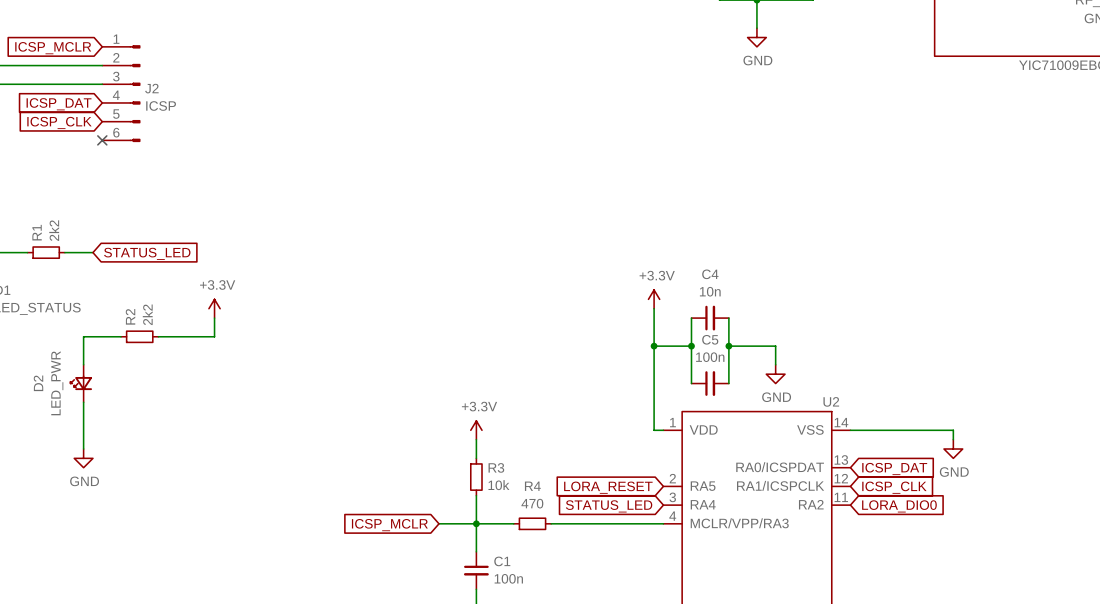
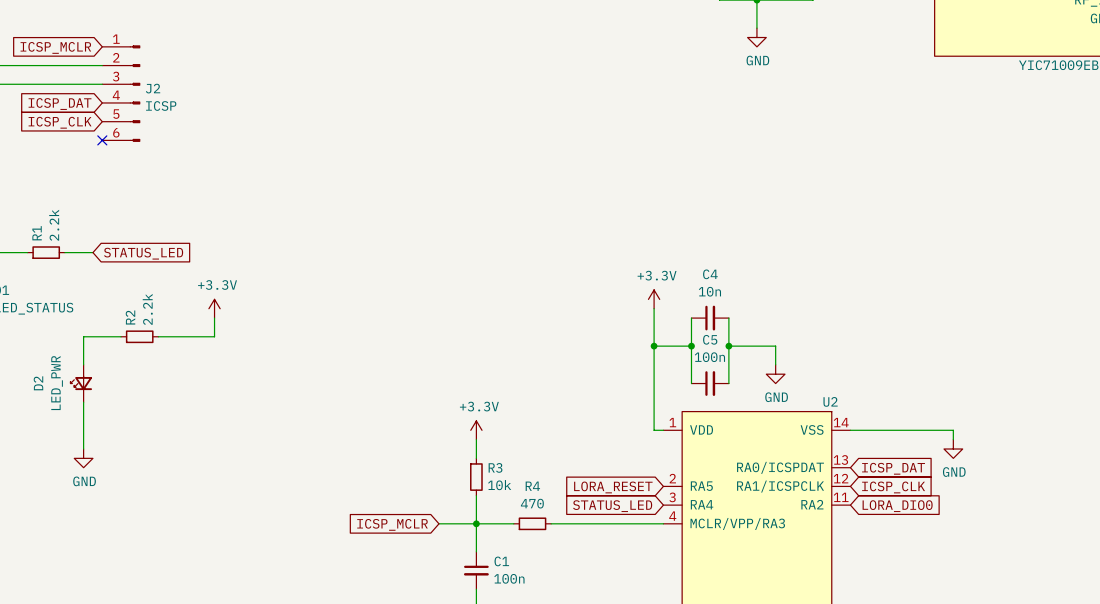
R1 value: 2k2 (54, 230) -> 2.2k (54, 225)
R2 value: 2k2 (147, 314) -> 2.2k (147, 309)

